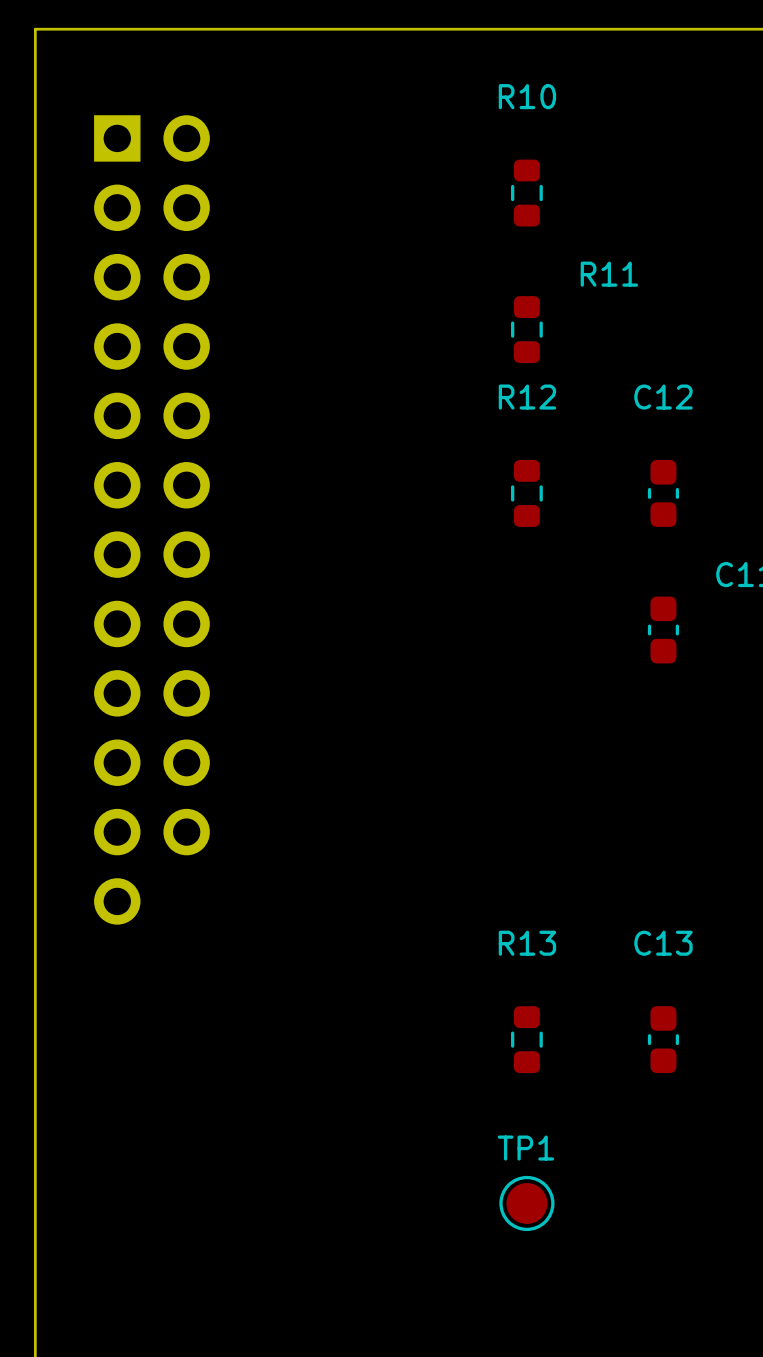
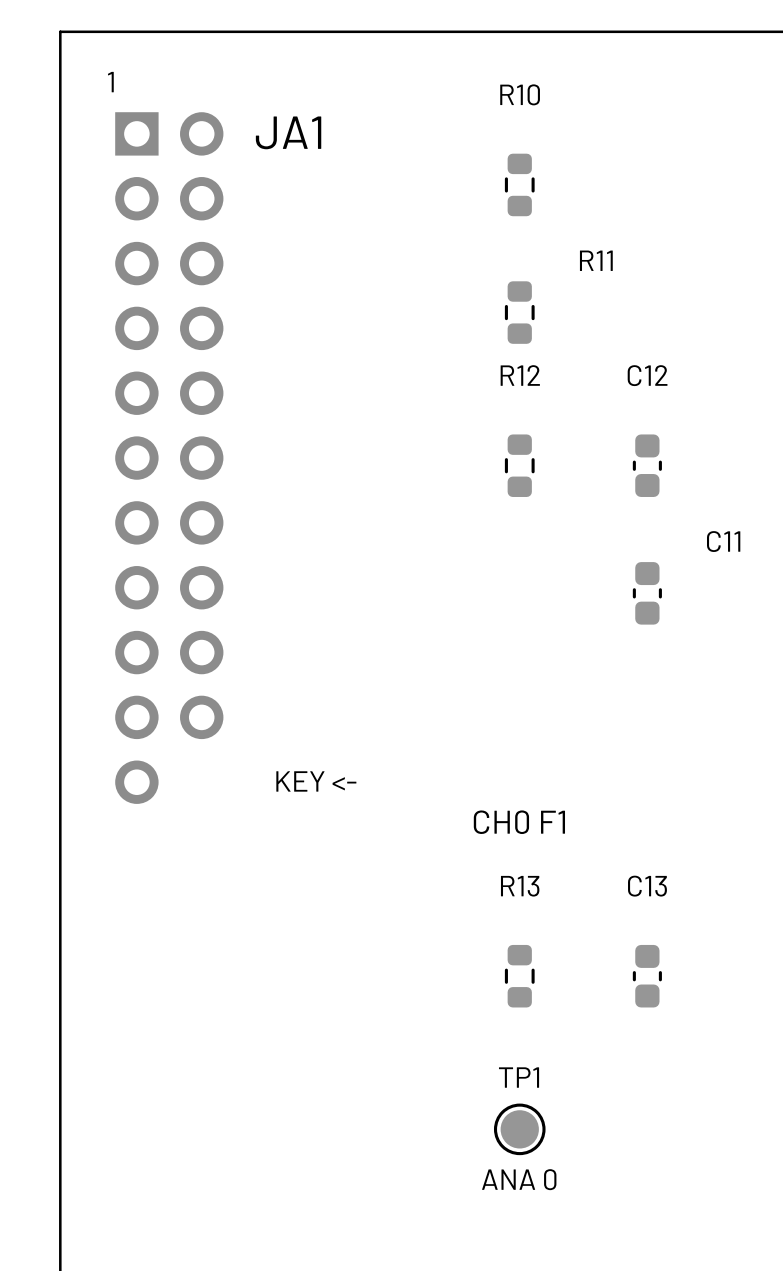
text: none -> 1 (110, 82)
JA1: none -> (169, 458)
part: (151, 519) -> none
text: none -> KEY <- (316, 781)
text: none -> CH0 F1 (519, 822)
text: none -> ANA 0 (519, 1179)

